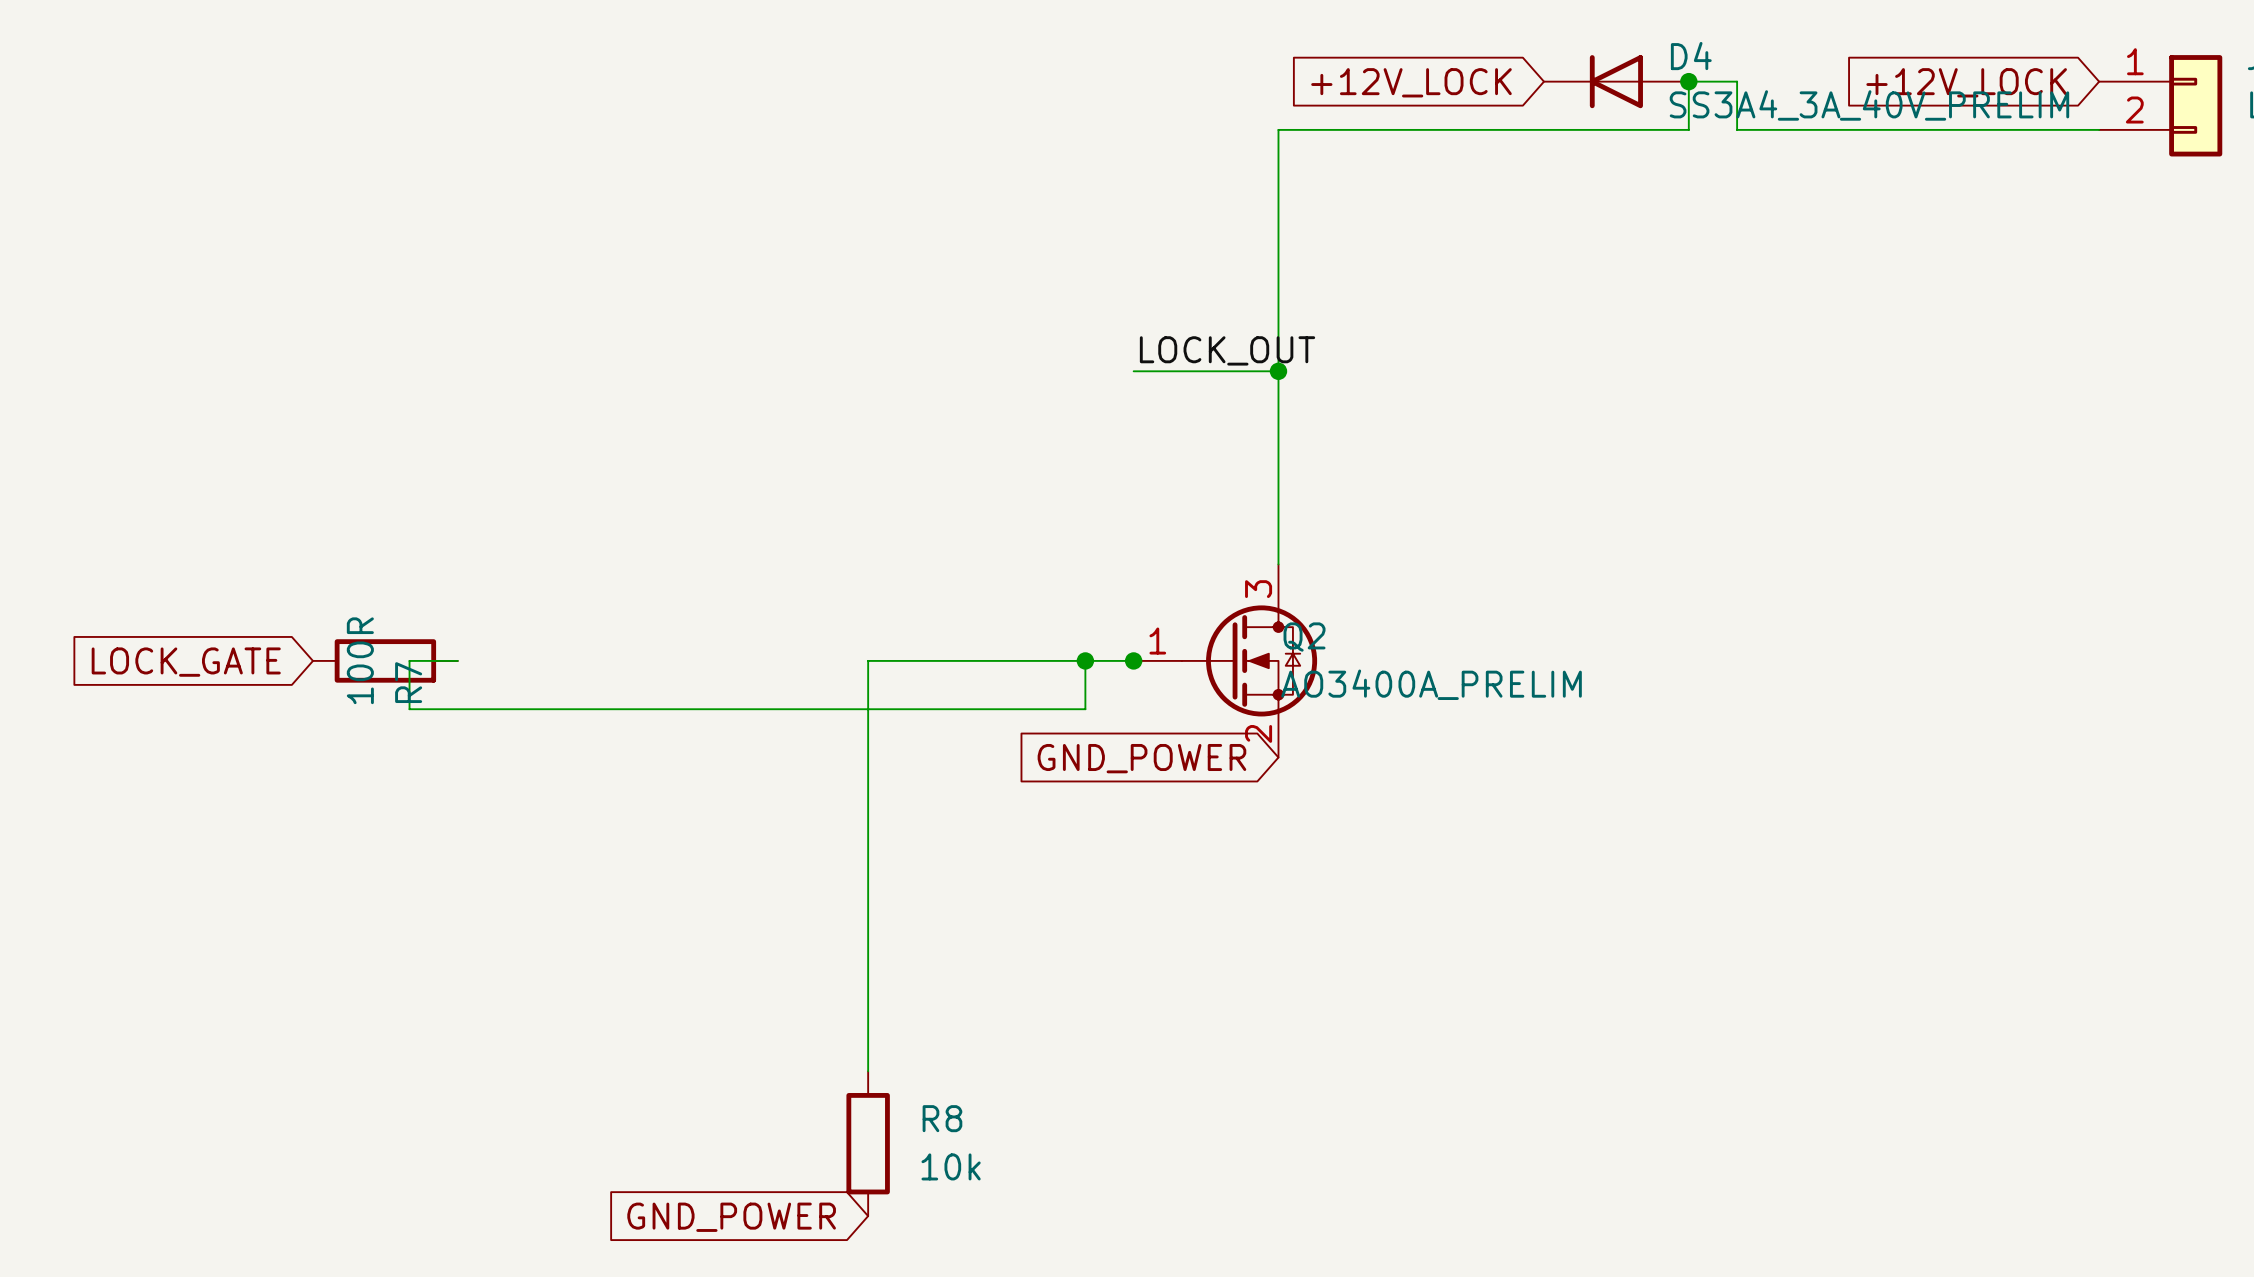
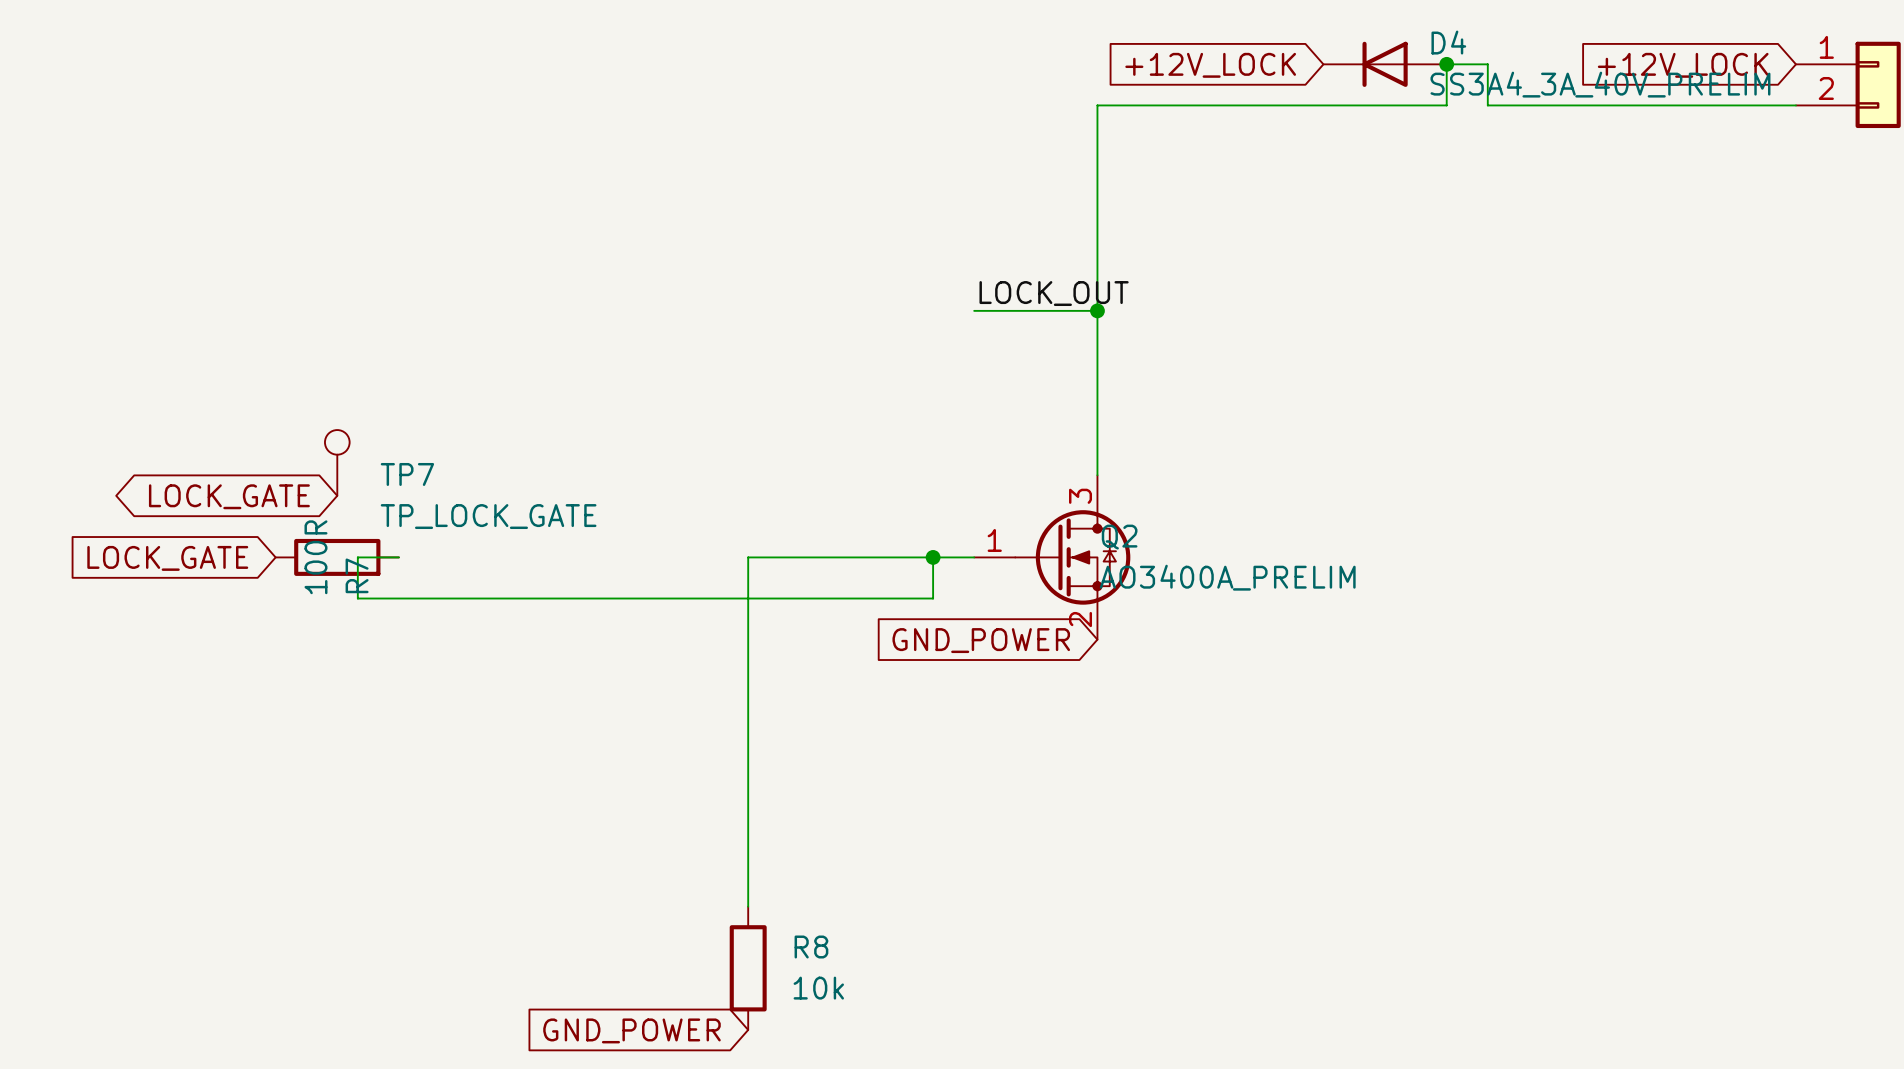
TP7: none -> TP_LOCK_GATE (337, 462)
global label: none -> LOCK_GATE (229, 496)
junction: (1133, 660) -> none

